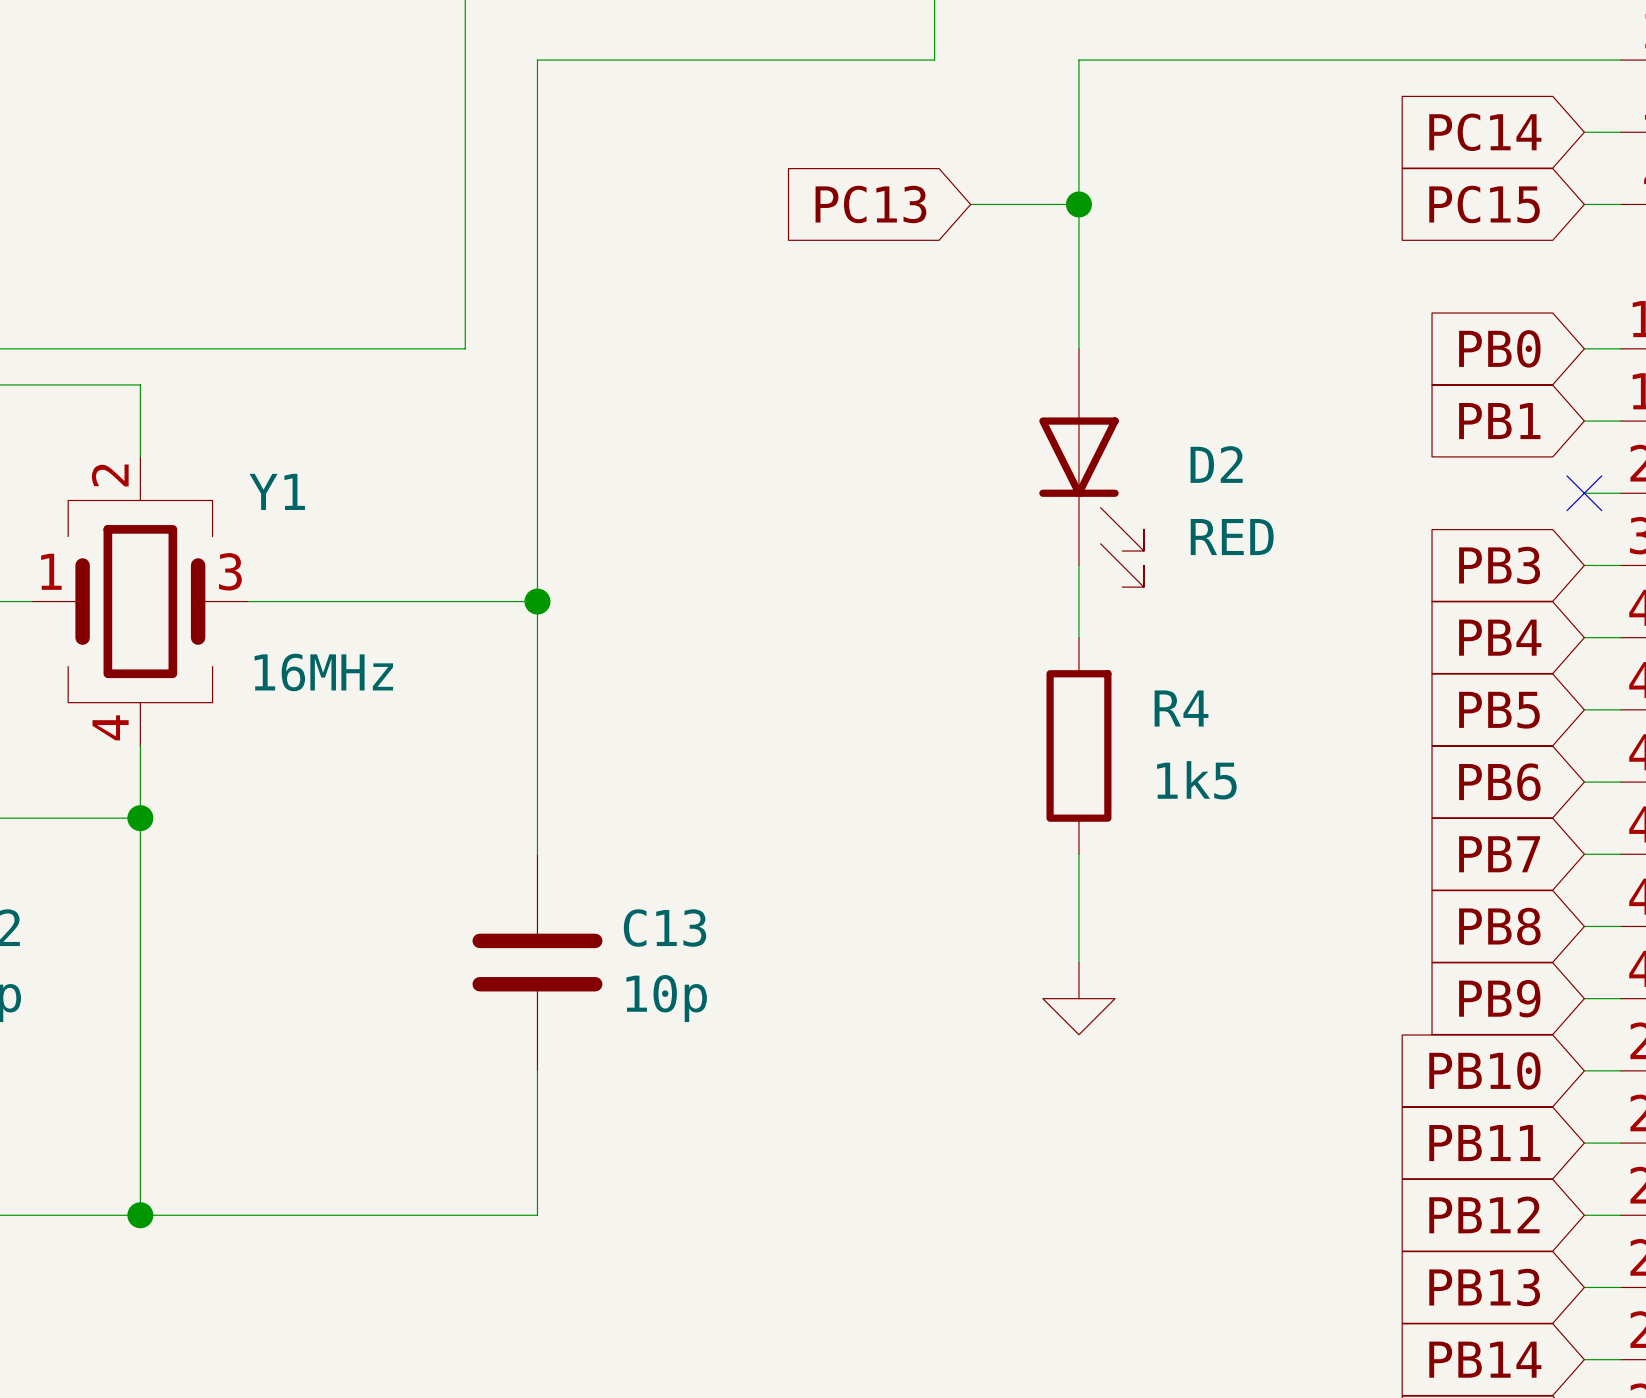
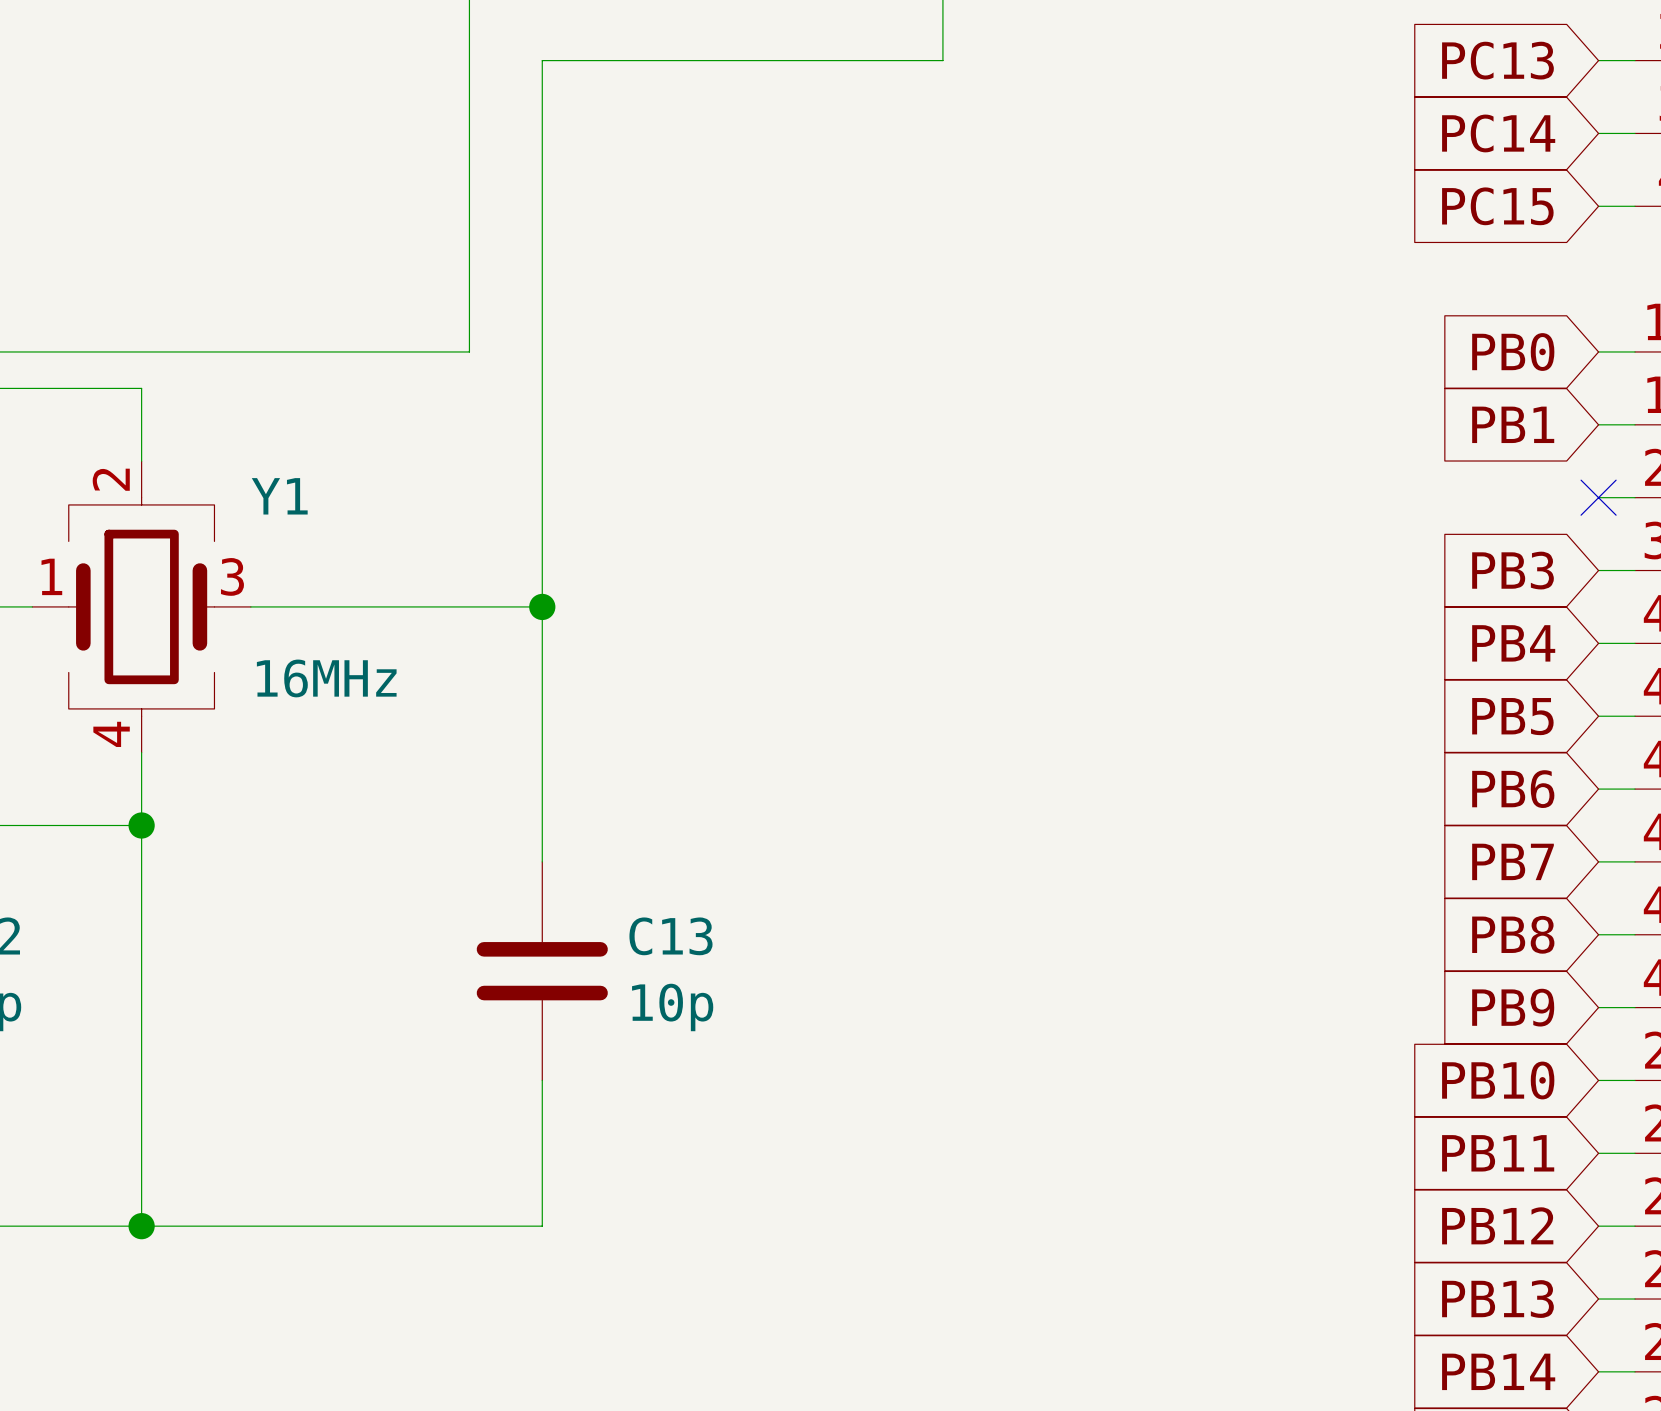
wire: (1584, 60) (1078, 60) (1078, 348) -> none
global label position: PC13 (870, 204) -> PC13 (1497, 60)
wire: (970, 204) (1078, 204) -> none
junction: (1078, 204) -> none
D2: RED (1091, 467) -> none
wire: (1078, 565) (1078, 637) -> none
R4: 1k5 (1078, 745) -> none
wire: (1078, 854) (1078, 962) -> none
power symbol: (1078, 998) -> none

